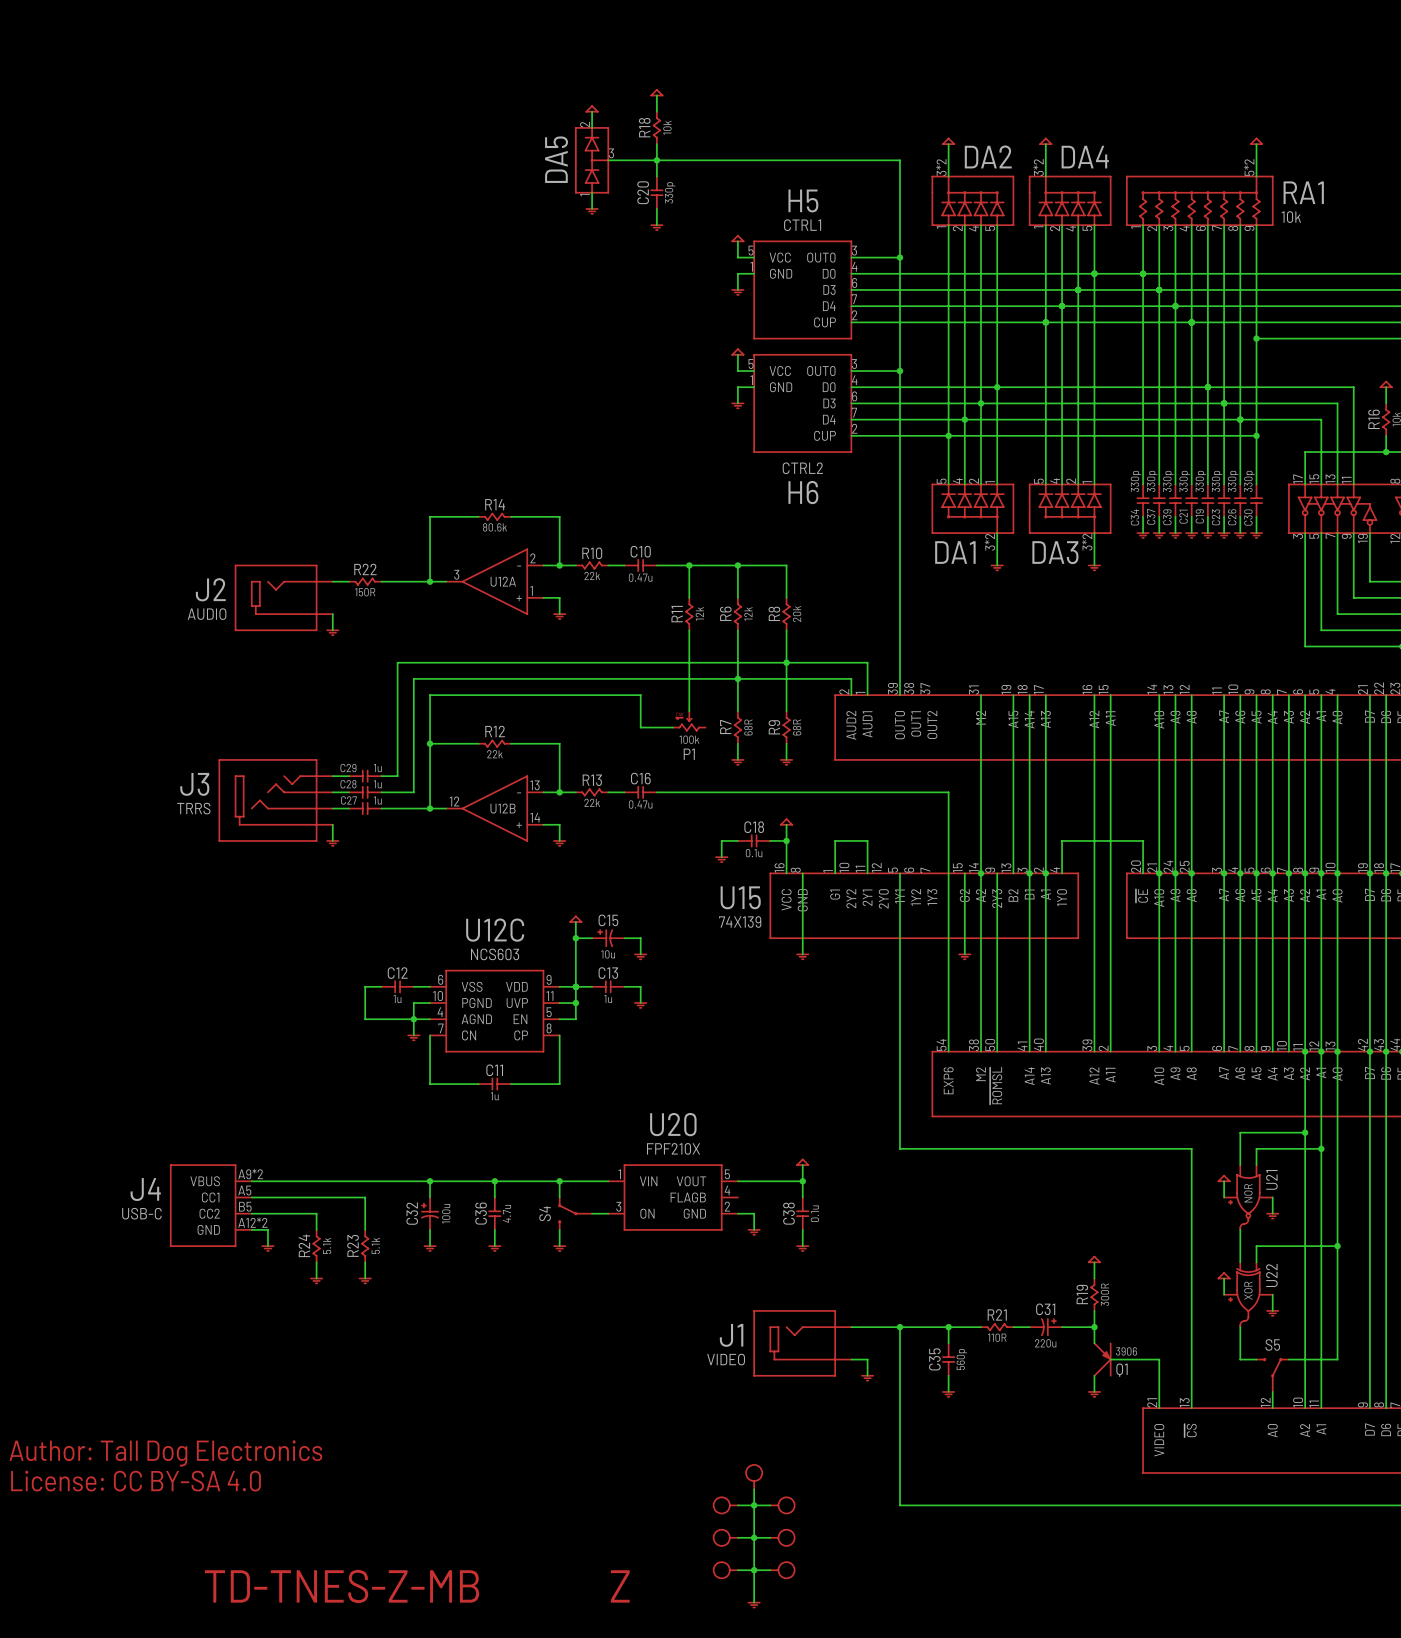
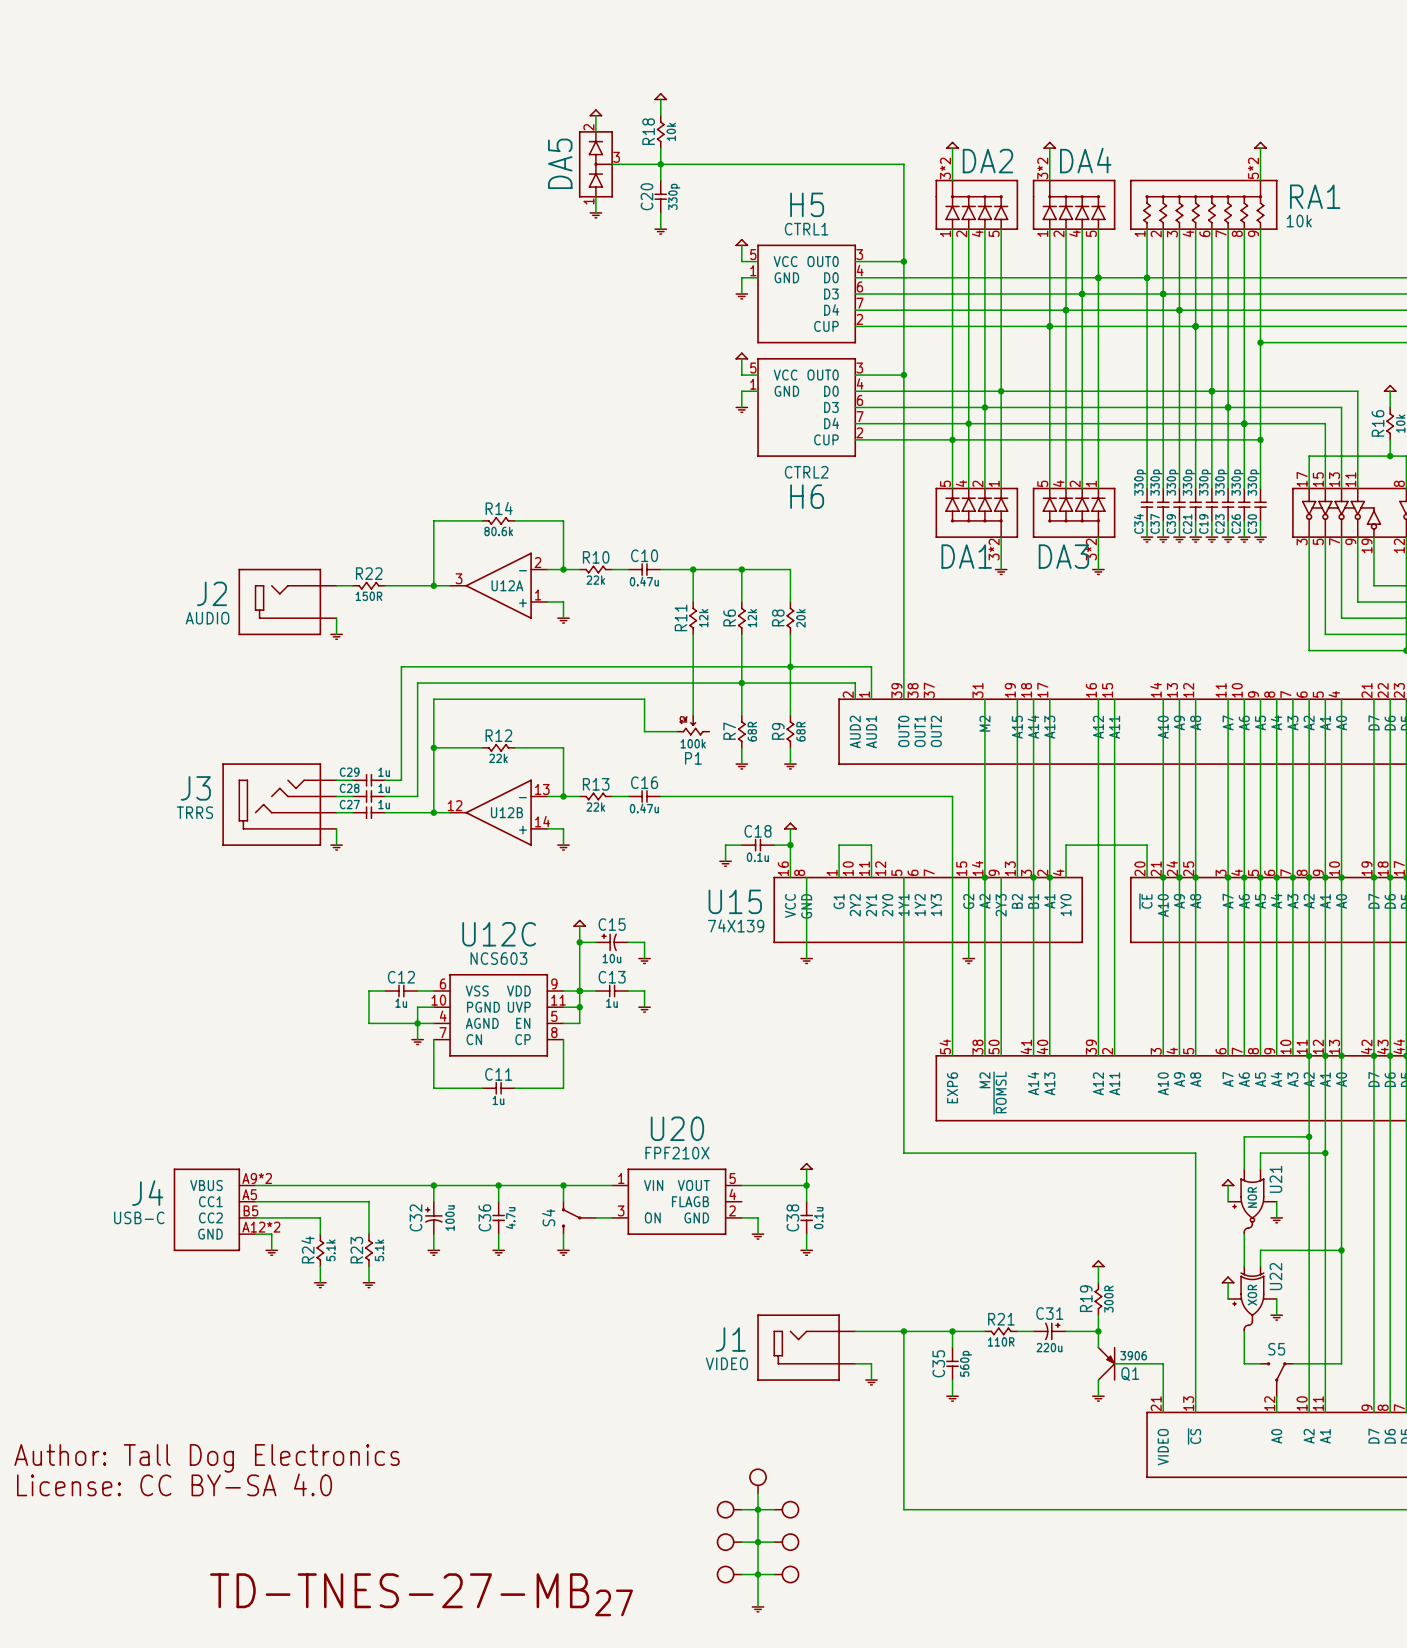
text: TD-TNES-Z-MB (342, 1586) -> TD-TNES-27-MB (399, 1590)
text: Z (620, 1586) -> none
text: none -> 27 (614, 1602)

